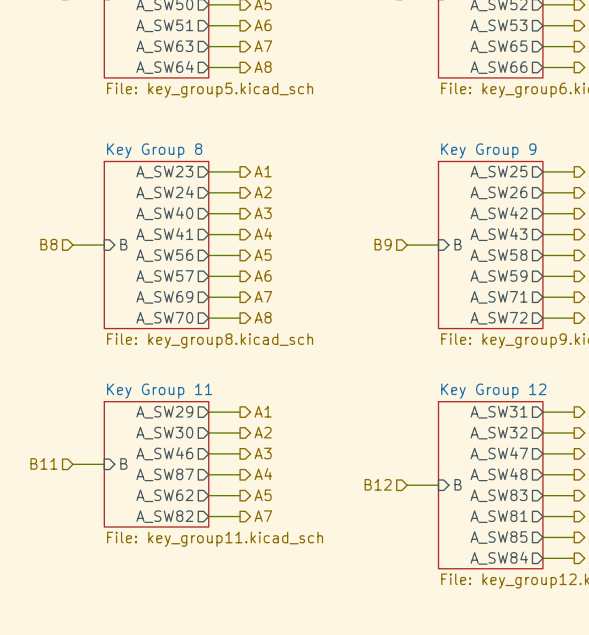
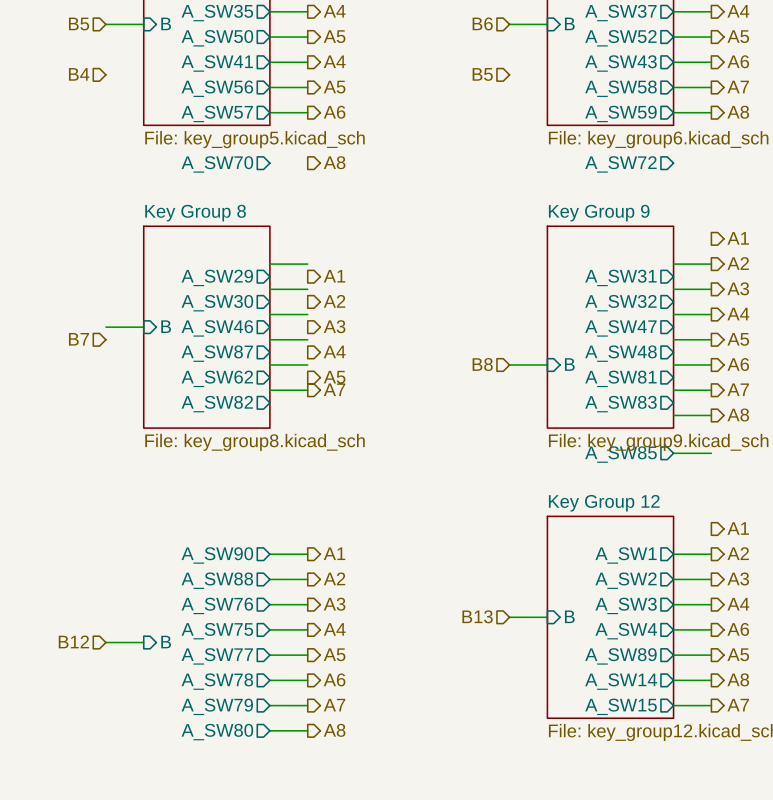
sheet pin: A_SW51 (164, 25) -> A_SW41 (217, 63)
hierarchical label: A6 (263, 25) -> A4 (334, 61)
sheet pin: A_SW53 (499, 25) -> A_SW43 (620, 63)
hierarchical label: none -> B4 (79, 74)
hierarchical label: none -> B5 (482, 74)
sheet pin: A_SW63 (164, 46) -> A_SW56 (217, 88)
hierarchical label: A7 (263, 46) -> A5 (334, 87)
sheet pin: A_SW65 (499, 46) -> A_SW58 (620, 88)
sheet pin: A_SW64 (165, 67) -> A_SW57 (217, 113)
hierarchical label: A8 (263, 67) -> A6 (334, 112)
sheet pin: A_SW66 (499, 67) -> A_SW59 (620, 113)
hierarchical label: none -> A8 (334, 162)
sheet pin: none -> A_SW70 (217, 164)
sheet pin: none -> A_SW72 (620, 164)
wire: (208, 171) (240, 171) -> none
hierarchical label position: A1 (263, 171) -> A1 (334, 276)
wire: (542, 171) (574, 171) -> none
sheet pin: A_SW23 (164, 172) -> none
sheet pin: A_SW25 (499, 172) -> none
sheet pin: A_SW24 (165, 192) -> none
hierarchical label position: A2 (263, 192) -> A2 (334, 301)
sheet pin: A_SW26 (499, 192) -> none
sheet pin: none -> A_SW29 (217, 277)
sheet pin: none -> A_SW31 (620, 277)
sheet pin: A_SW40 (164, 213) -> none
hierarchical label position: A3 (263, 213) -> A3 (334, 326)
sheet pin: A_SW42 (499, 213) -> none
sheet pin: none -> A_SW30 (217, 303)
sheet pin: none -> A_SW32 (620, 303)
hierarchical label position: A4 (263, 233) -> A4 (334, 351)
sheet pin: A_SW41 (164, 234) -> none
sheet pin: A_SW43 (499, 234) -> none
hierarchical label: B8 (48, 244) -> none
sheet pin: none -> A_SW46 (217, 328)
hierarchical label: B9 (383, 244) -> none
sheet pin position: B (458, 244) -> B (569, 364)
sheet pin: none -> A_SW47 (620, 328)
wire: (407, 245) (438, 245) -> (509, 365) (547, 365)
hierarchical label: none -> B7 (78, 339)
sheet pin: A_SW56 (164, 255) -> none
hierarchical label position: A5 (263, 255) -> A5 (334, 377)
sheet pin: A_SW58 (499, 255) -> none
sheet pin: none -> A_SW48 (620, 353)
sheet pin: none -> A_SW87 (217, 353)
hierarchical label: A6 (263, 275) -> none
hierarchical label: none -> B8 (482, 364)
sheet pin: A_SW57 (165, 276) -> none
sheet pin: A_SW59 (499, 276) -> none
sheet pin: none -> A_SW62 (217, 378)
sheet pin: none -> A_SW81 (620, 378)
sheet pin: A_SW69 (164, 297) -> none
sheet pin: A_SW71 (499, 297) -> none
sheet pin: none -> A_SW82 (217, 404)
sheet pin: none -> A_SW83 (620, 404)
hierarchical label: A8 (263, 317) -> none
sheet pin: A_SW70 (164, 318) -> none
wire: (208, 318) (240, 318) -> none
sheet pin: A_SW72 (499, 318) -> none
sheet pin: none -> A_SW85 (620, 454)
hierarchical label: A1 (263, 411) -> none
sheet pin: A_SW29 (164, 412) -> none
wire: (208, 412) (240, 412) -> (269, 730) (307, 730)
sheet pin: A_SW31 (499, 412) -> none
wire: (542, 412) (574, 412) -> (673, 453) (711, 453)
hierarchical label: A2 (263, 432) -> A1 (334, 553)
sheet pin: A_SW30 (164, 433) -> A_SW90 (217, 555)
sheet pin: A_SW32 (499, 433) -> A_SW1 (626, 555)
sheet pin: A_SW46 (164, 453) -> A_SW88 (217, 580)
hierarchical label: A3 (263, 453) -> A2 (334, 578)
sheet pin: A_SW47 (499, 453) -> A_SW2 (626, 580)
hierarchical label: B11 (43, 463) -> none
sheet pin position: B (123, 463) -> B (166, 642)
wire: (72, 464) (104, 464) -> (269, 705) (307, 705)
sheet Key Group 11: File: key_group11.kicad_sch (156, 464) -> none
sheet pin: A_SW87 (165, 474) -> A_SW76 (217, 605)
hierarchical label: A4 (263, 474) -> A3 (334, 604)
sheet pin: A_SW48 (499, 474) -> A_SW3 (626, 605)
hierarchical label: B12 (378, 484) -> B13 (477, 616)
sheet pin: A_SW62 (164, 495) -> A_SW75 (217, 631)
hierarchical label: A5 (263, 495) -> A4 (334, 629)
sheet pin: A_SW83 (499, 495) -> A_SW4 (626, 631)
hierarchical label: none -> B12 (73, 641)
wire: none -> (105, 642) (143, 642)
sheet pin: A_SW82 (164, 516) -> A_SW77 (217, 656)
hierarchical label: A7 (263, 516) -> A5 (334, 654)
sheet pin: A_SW81 (499, 516) -> A_SW89 (620, 656)
sheet pin: none -> A_SW78 (217, 681)
wire: none -> (269, 680) (307, 680)
hierarchical label: none -> A6 (334, 679)
sheet pin: A_SW85 (499, 537) -> A_SW14 (621, 681)
hierarchical label: none -> A7 (334, 705)
sheet pin: none -> A_SW79 (217, 706)
sheet pin: A_SW84 (499, 558) -> A_SW15 (620, 706)
hierarchical label: none -> A8 (334, 730)
sheet pin: none -> A_SW80 (217, 732)

